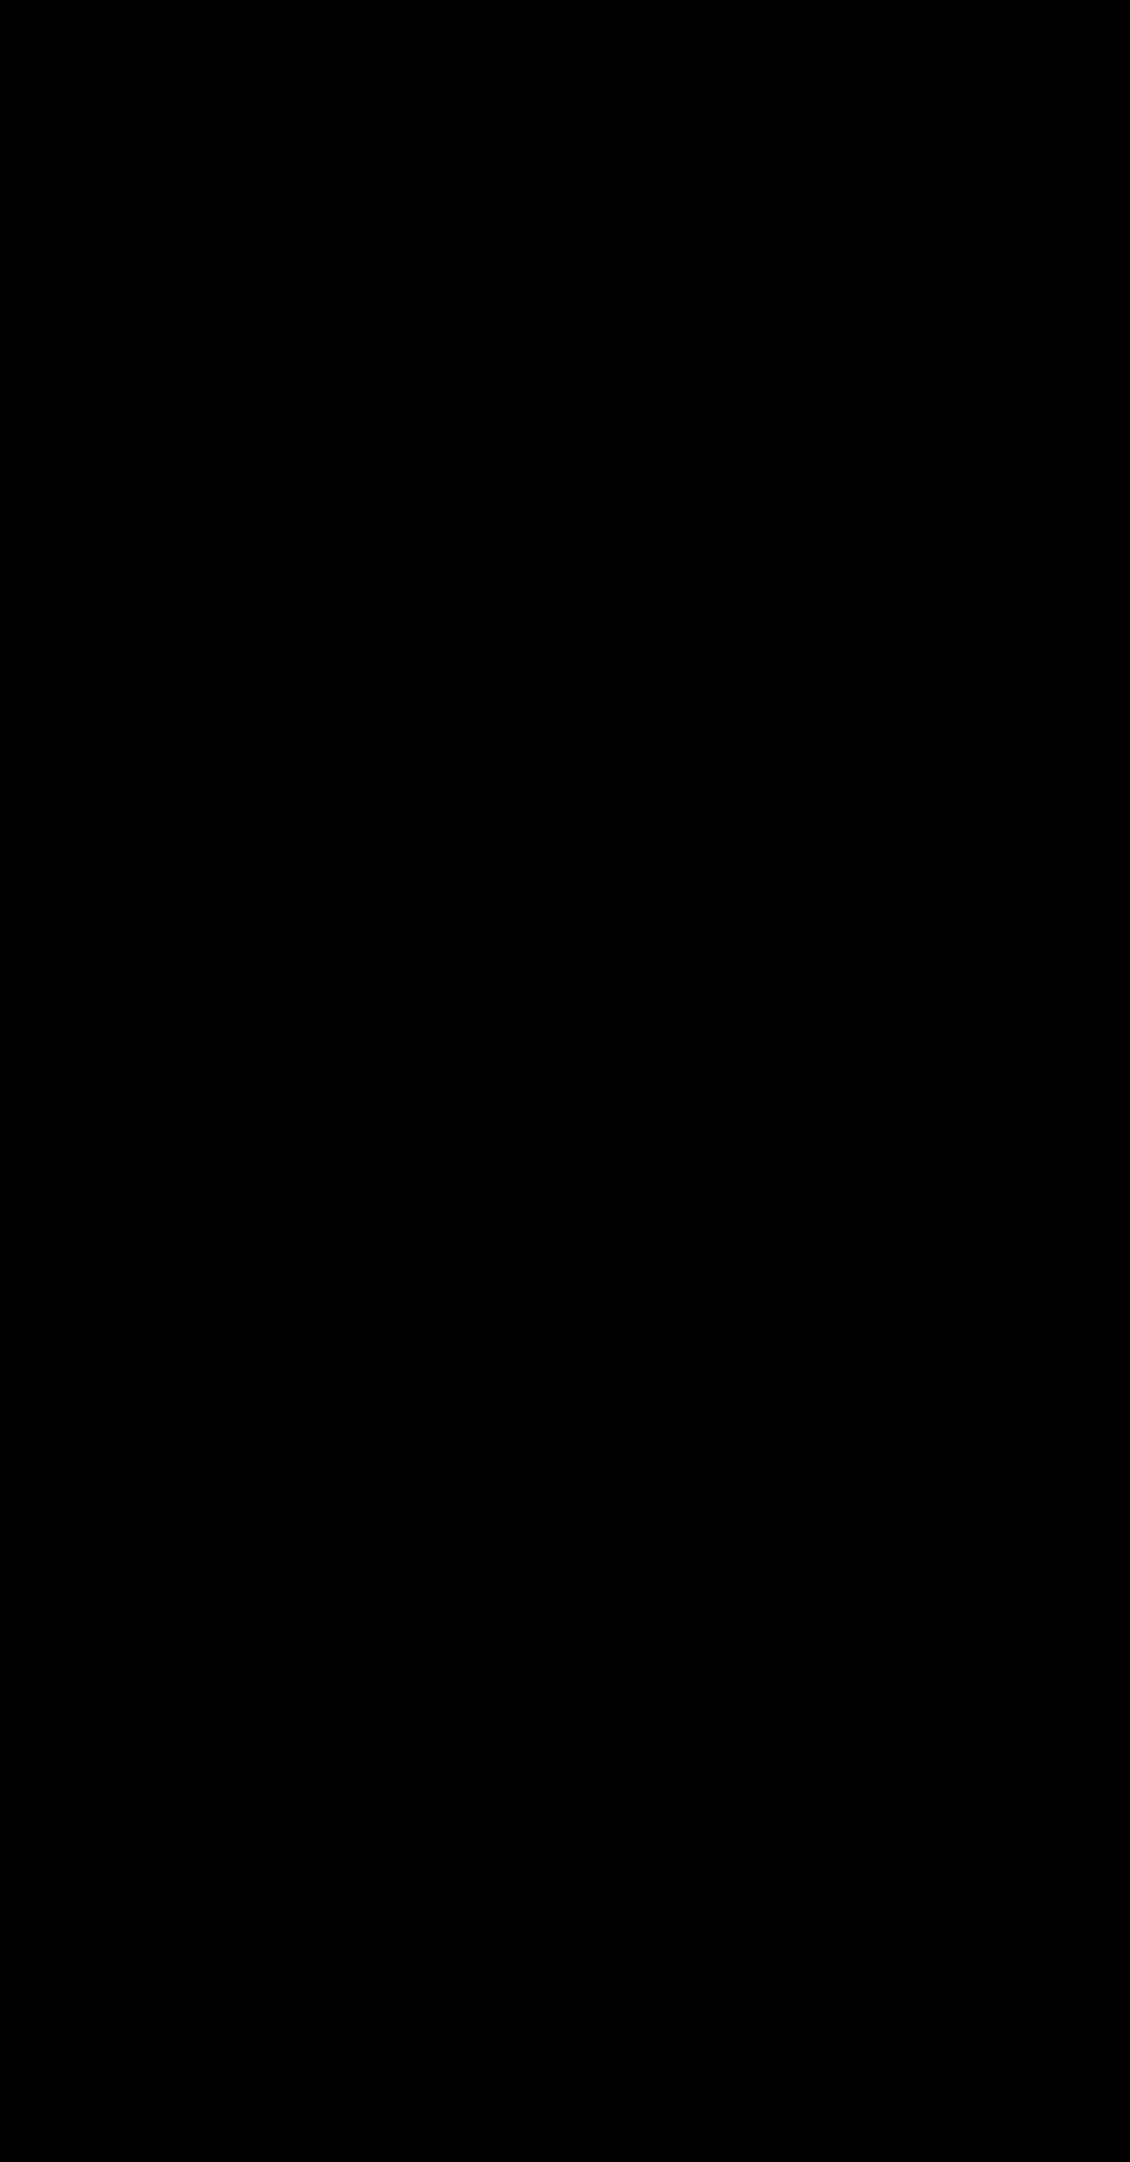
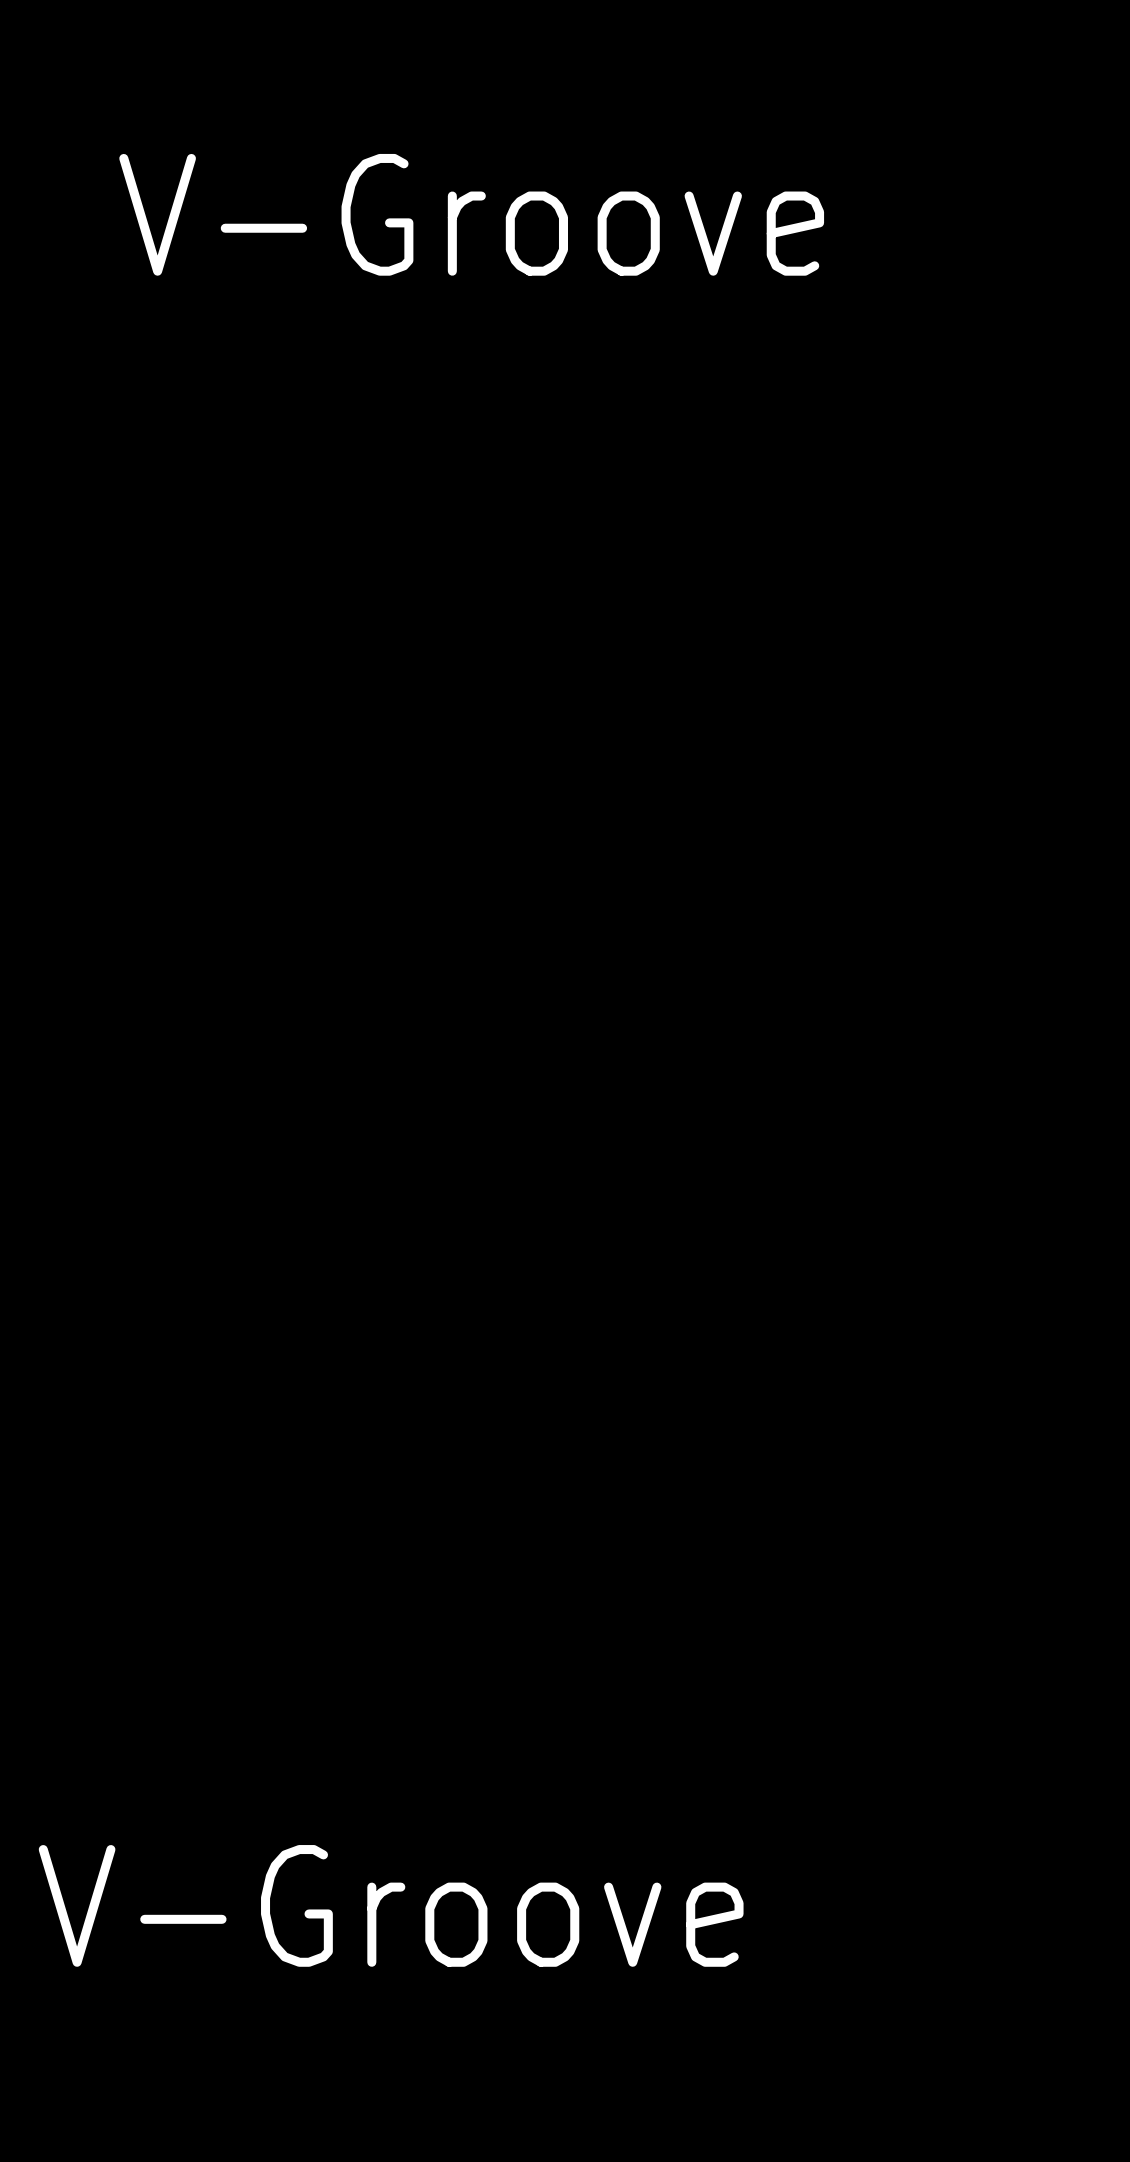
text: none -> V-Groove (471, 214)
text: none -> V-Groove (391, 1905)

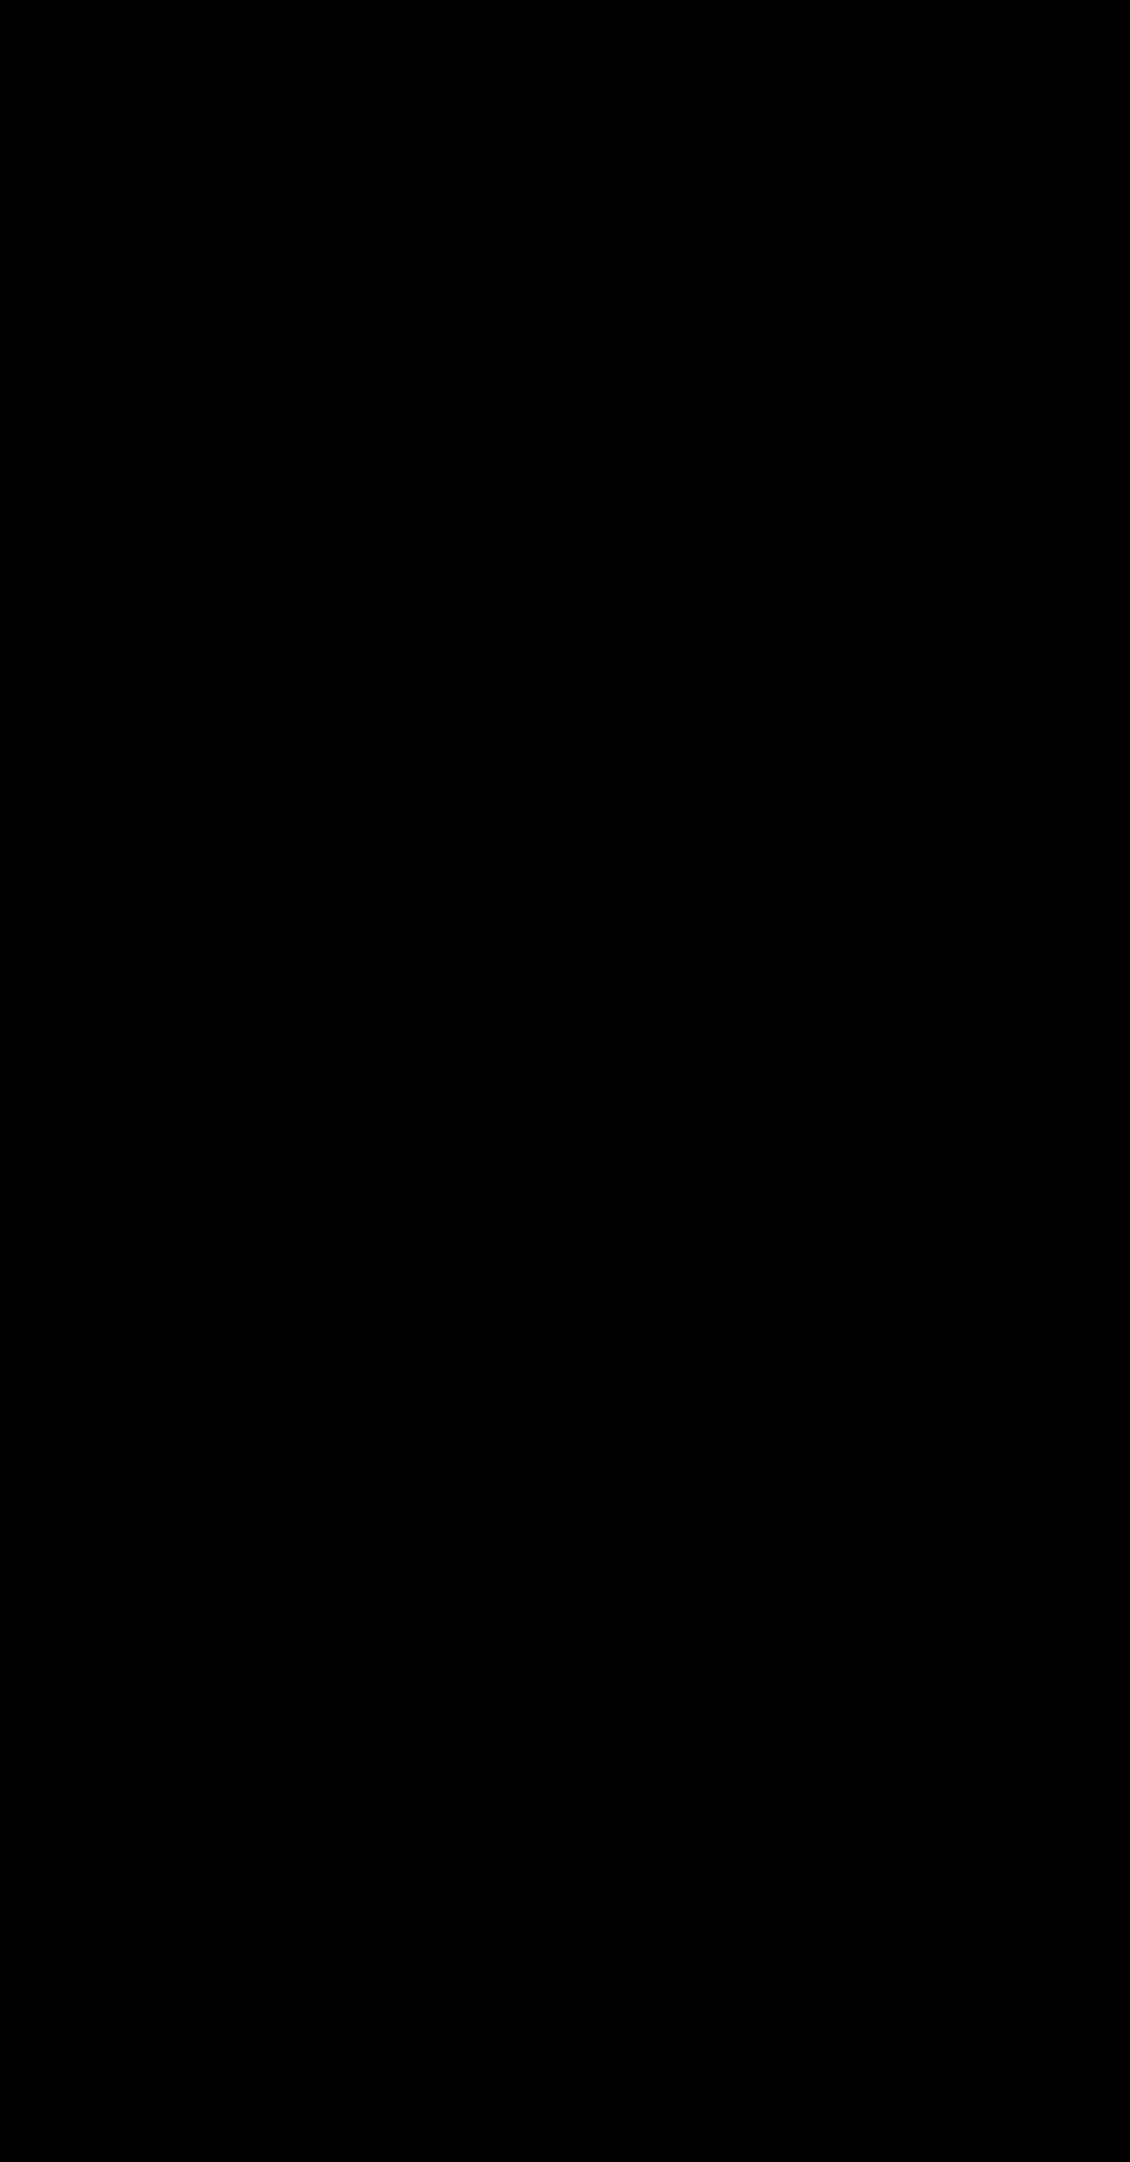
text: V-Groove (471, 214) -> none
text: V-Groove (391, 1905) -> none

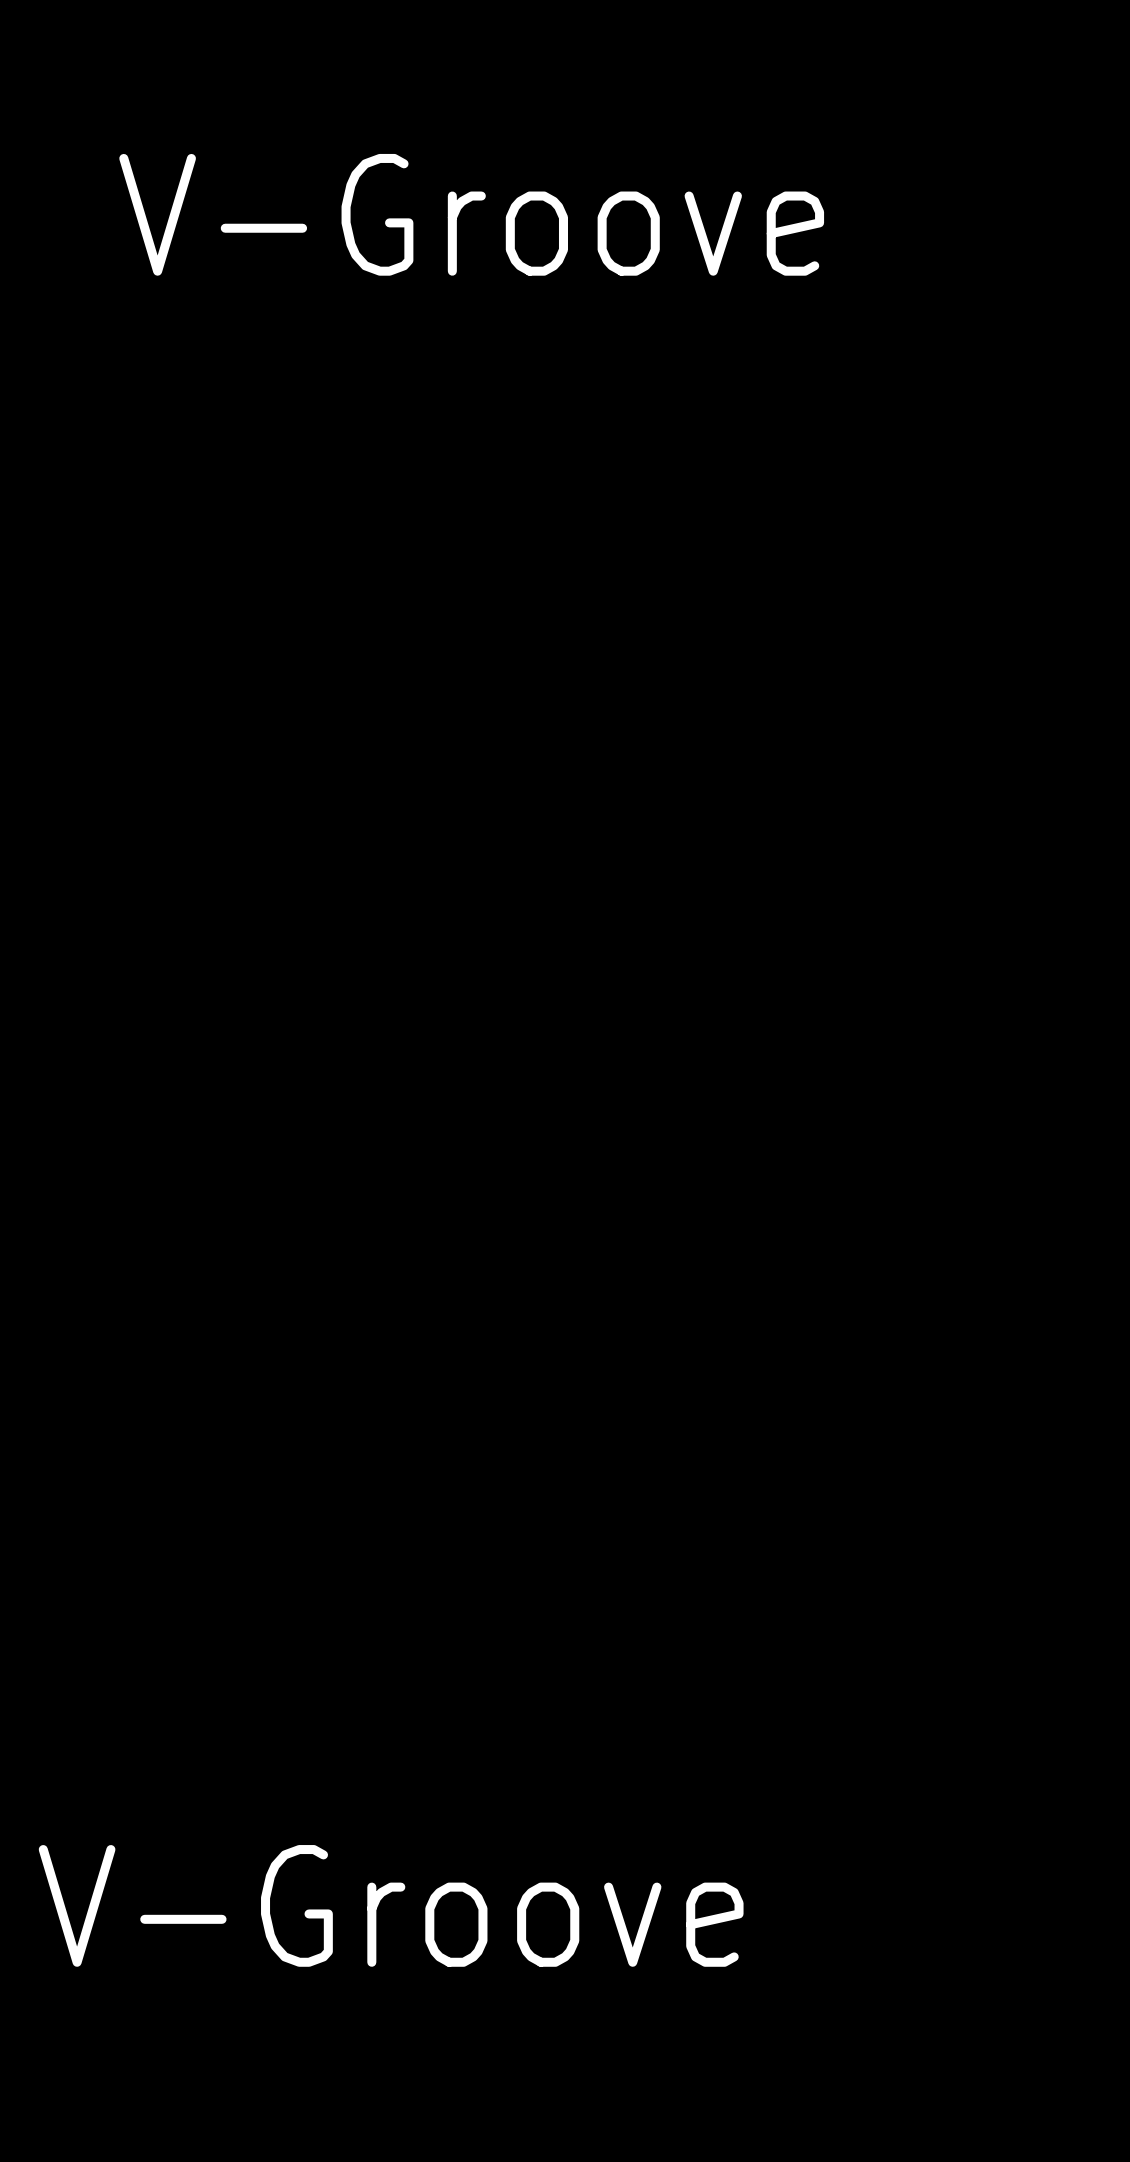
text: none -> V-Groove (471, 214)
text: none -> V-Groove (391, 1905)

